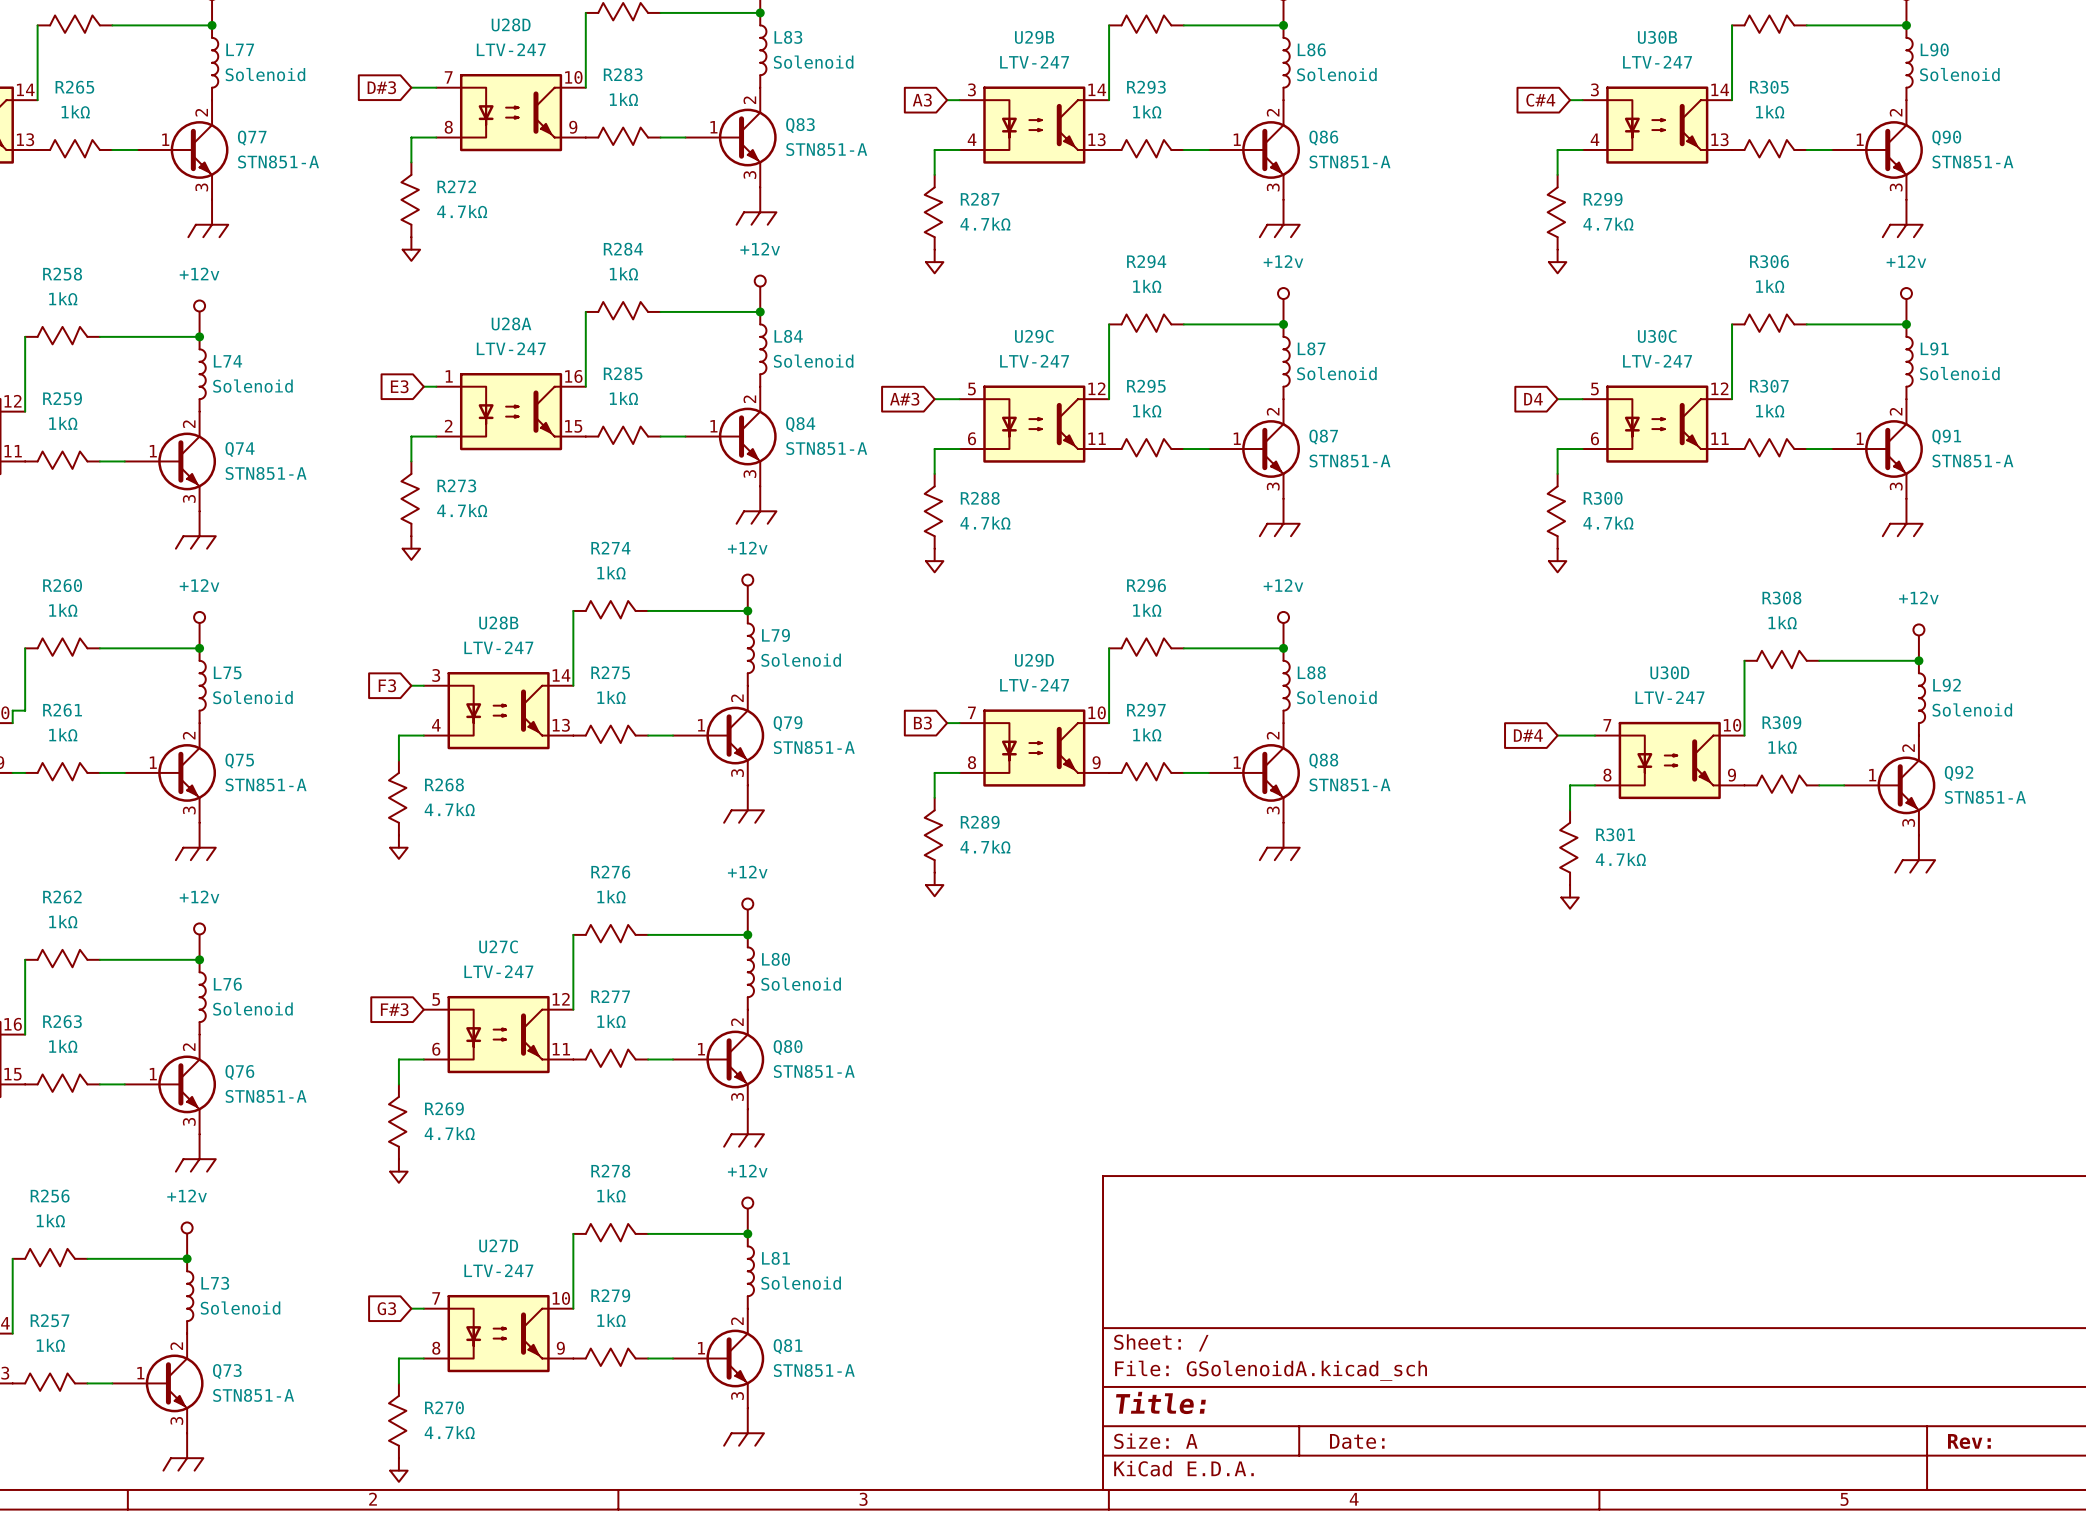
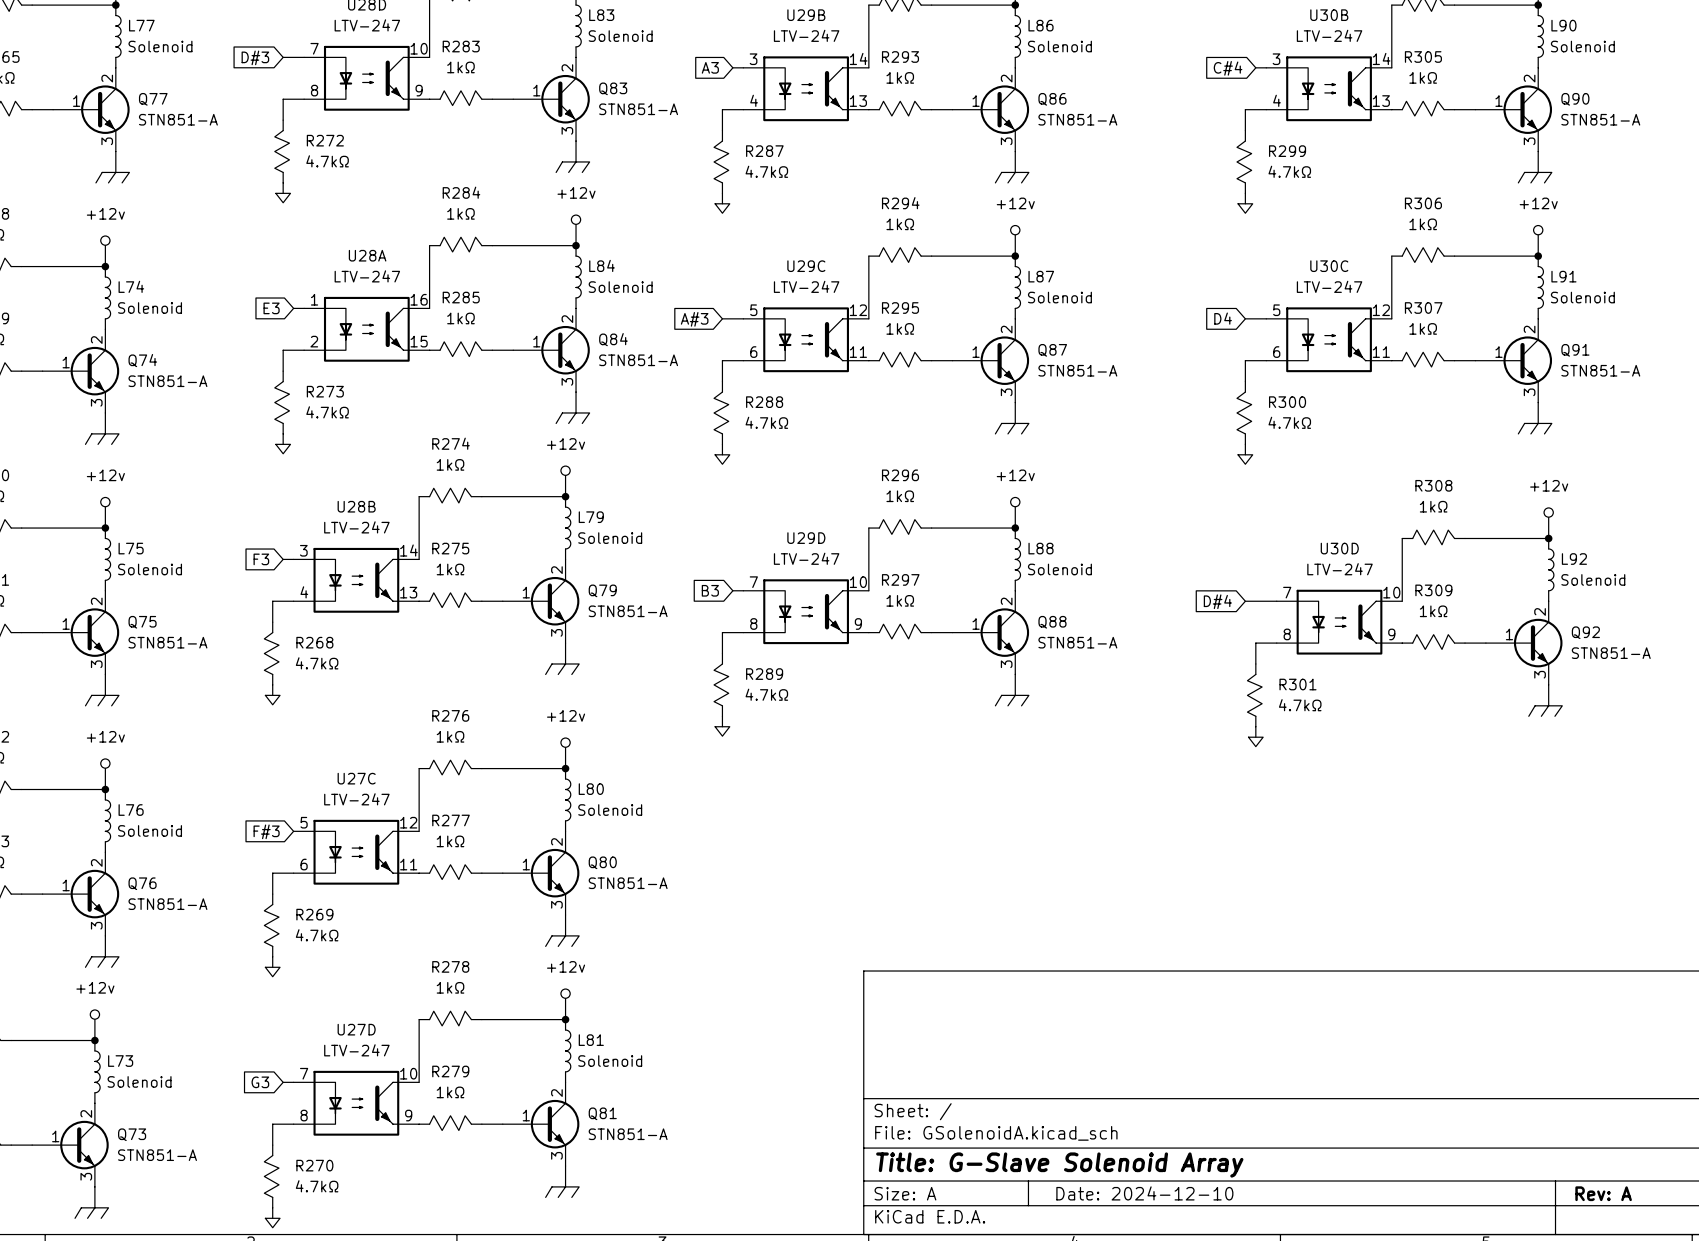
title block: Title: (1160, 1402) -> Title: G-Slave Solenoid Array (1059, 1165)
title block: Date: (1357, 1441) -> Date: 2024-12-10 (1144, 1193)
title block: Rev: (1969, 1441) -> Rev: A (1603, 1193)

